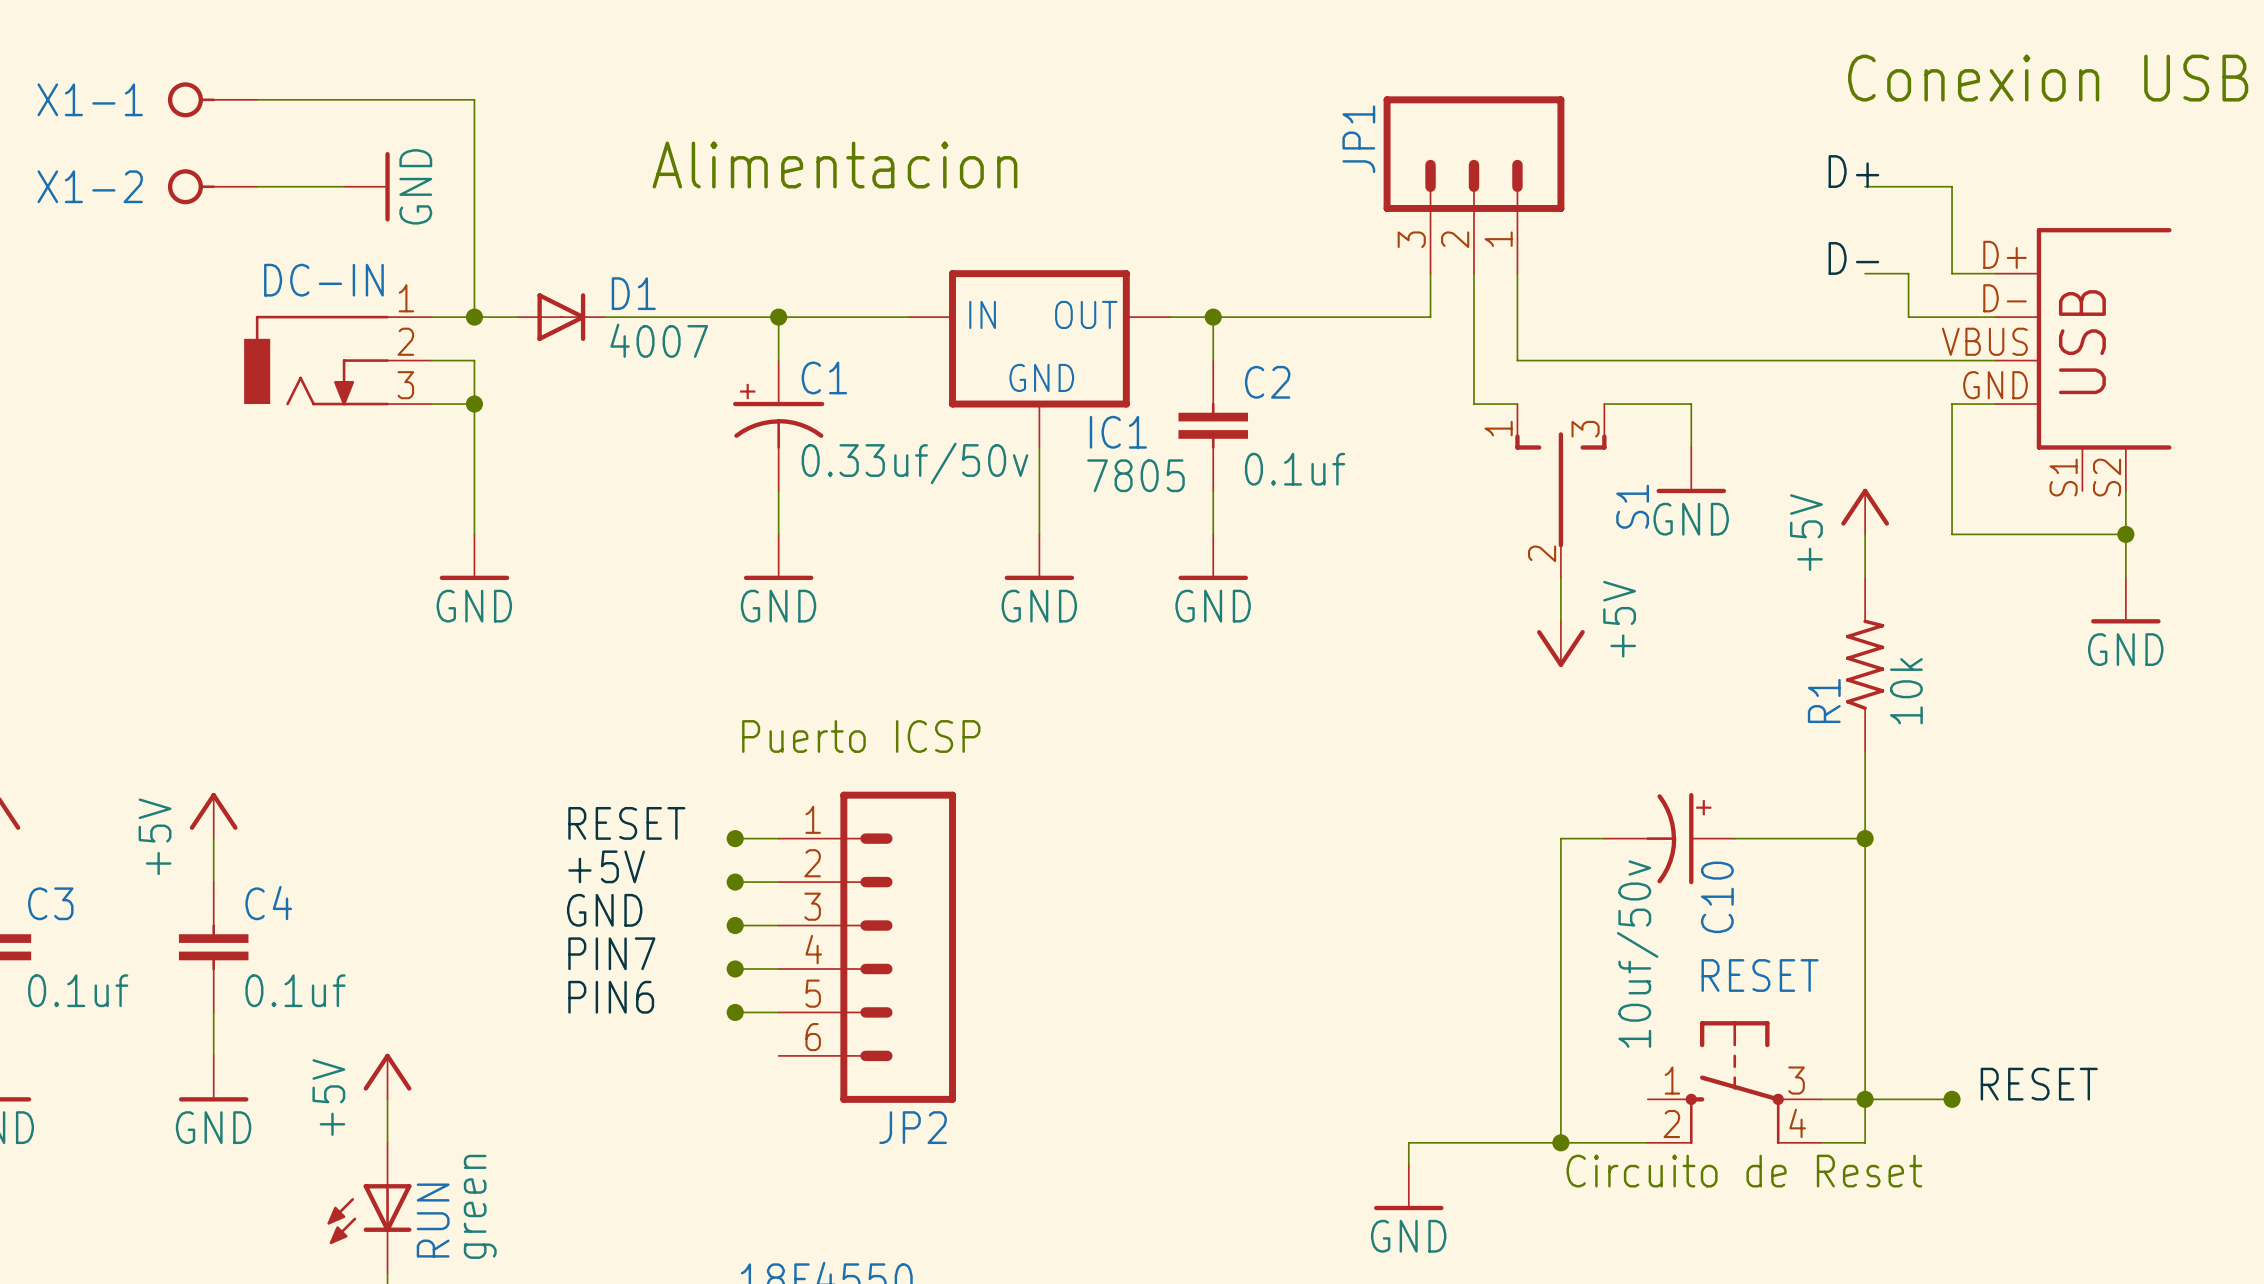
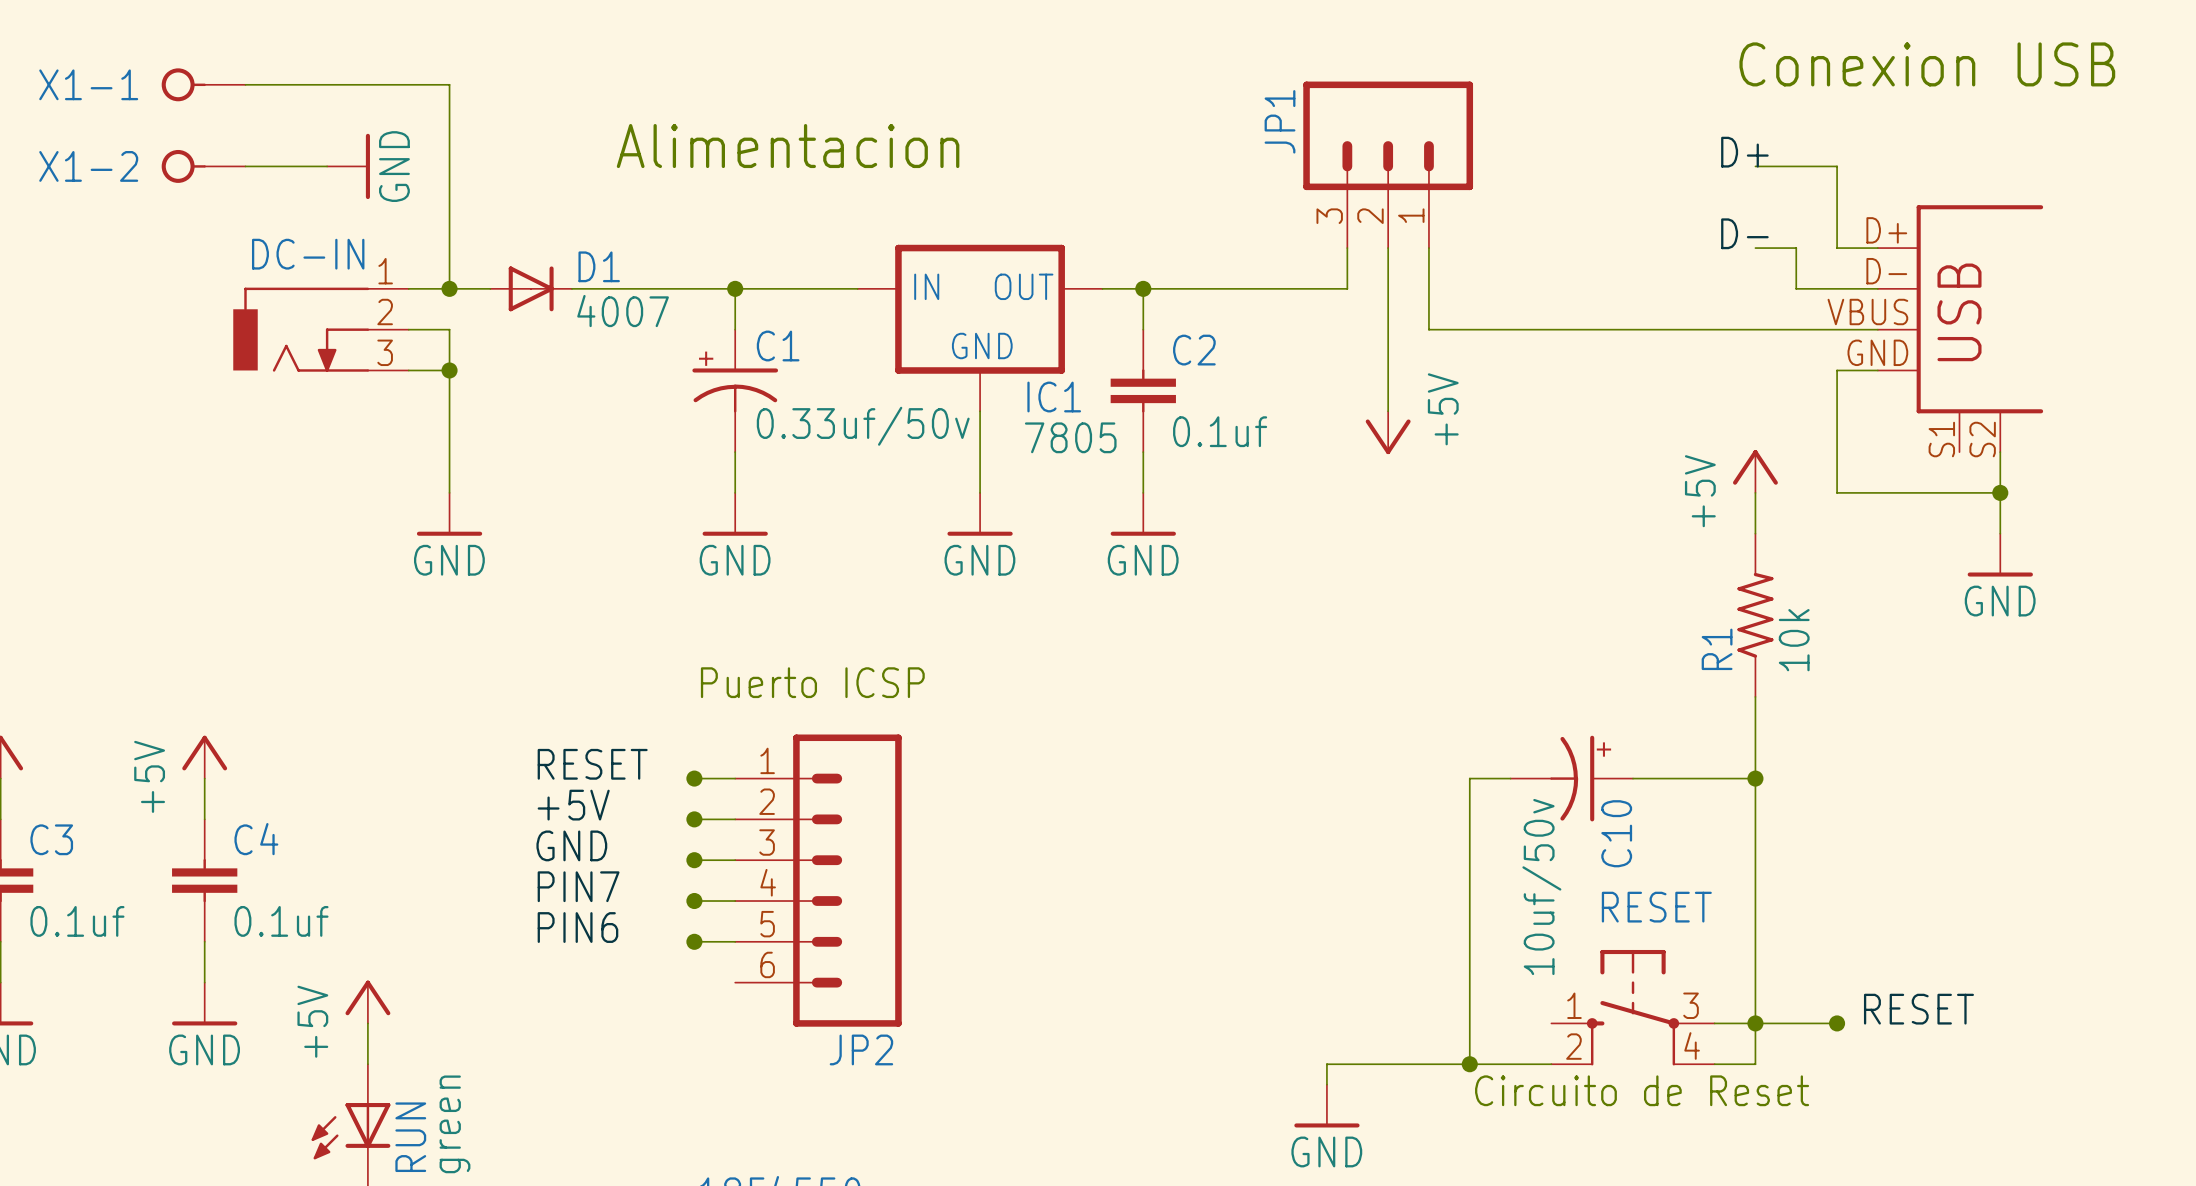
wire: (1473, 404) (1517, 404) -> (1388, 370) (1388, 411)
wire: (1604, 404) (1691, 404) (1691, 447) -> none
power symbol: GND (1691, 470) -> none
S1: (1560, 490) -> none
wire: (1560, 577) (1560, 621) -> none
power symbol position: +5V (1560, 644) -> +5V (1388, 432)

